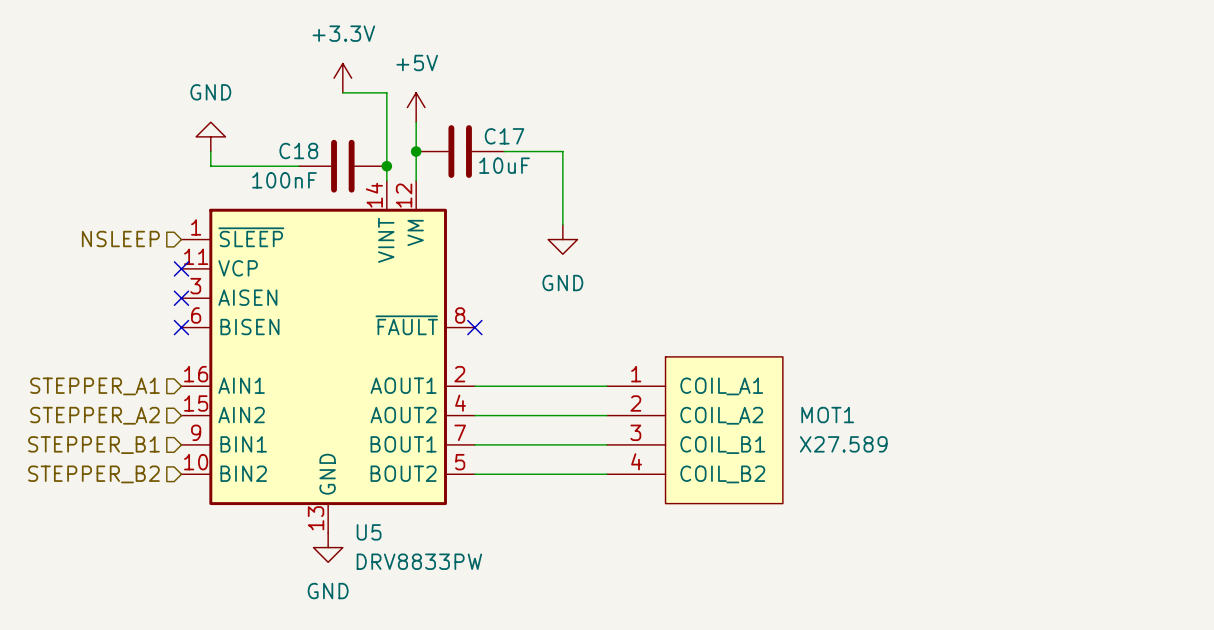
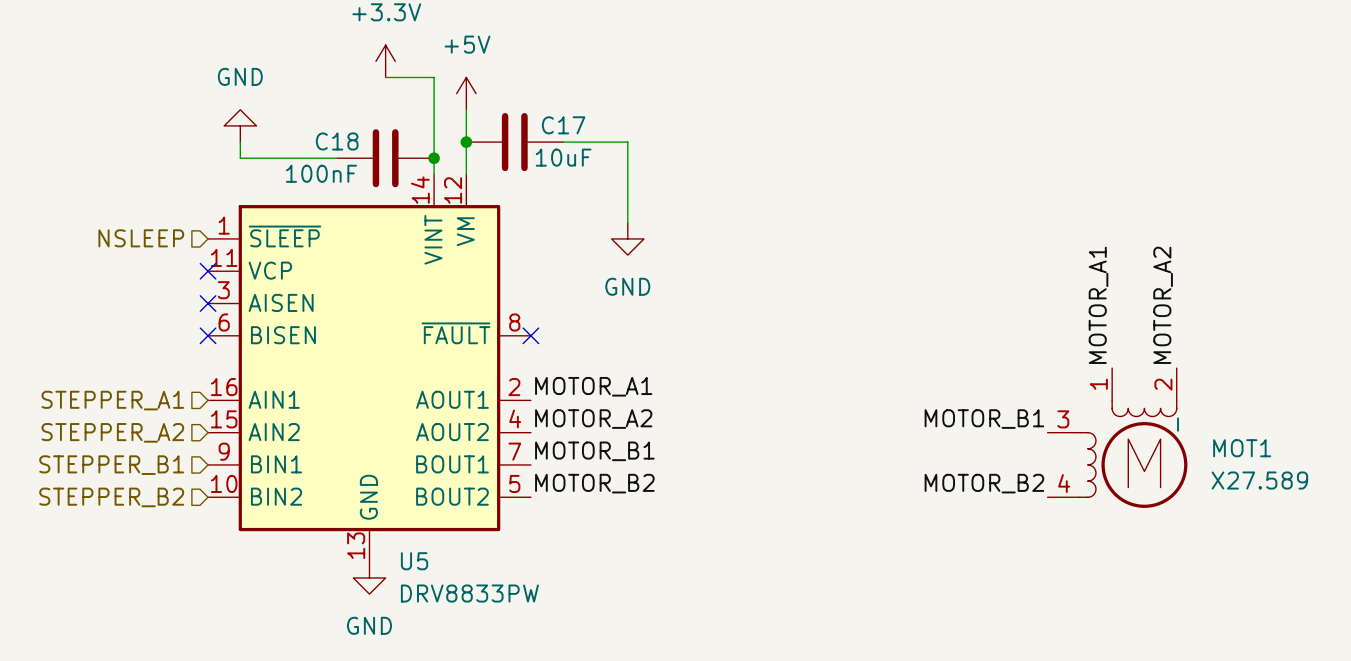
label: none -> MOTOR_A1 (1098, 305)
label: none -> MOTOR_A2 (1163, 305)
MOT1 symbol: [606, 356, 783, 504] -> [1047, 368, 1188, 508]
label: none -> MOTOR_A1 (593, 386)
wire: (474, 386) (606, 386) -> none
label: none -> MOTOR_A2 (593, 419)
label: none -> MOTOR_B1 (984, 419)
wire: (474, 415) (606, 415) -> none
MOT1 name position: MOT1 (827, 415) -> MOT1 (1242, 448)
label: none -> MOTOR_B1 (594, 451)
wire: (474, 444) (606, 444) -> none
MOT1 value position: X27.589 (843, 444) -> X27.589 (1259, 480)
label: none -> MOTOR_B2 (594, 483)
label: none -> MOTOR_B2 (984, 483)
wire: (474, 474) (606, 474) -> none

